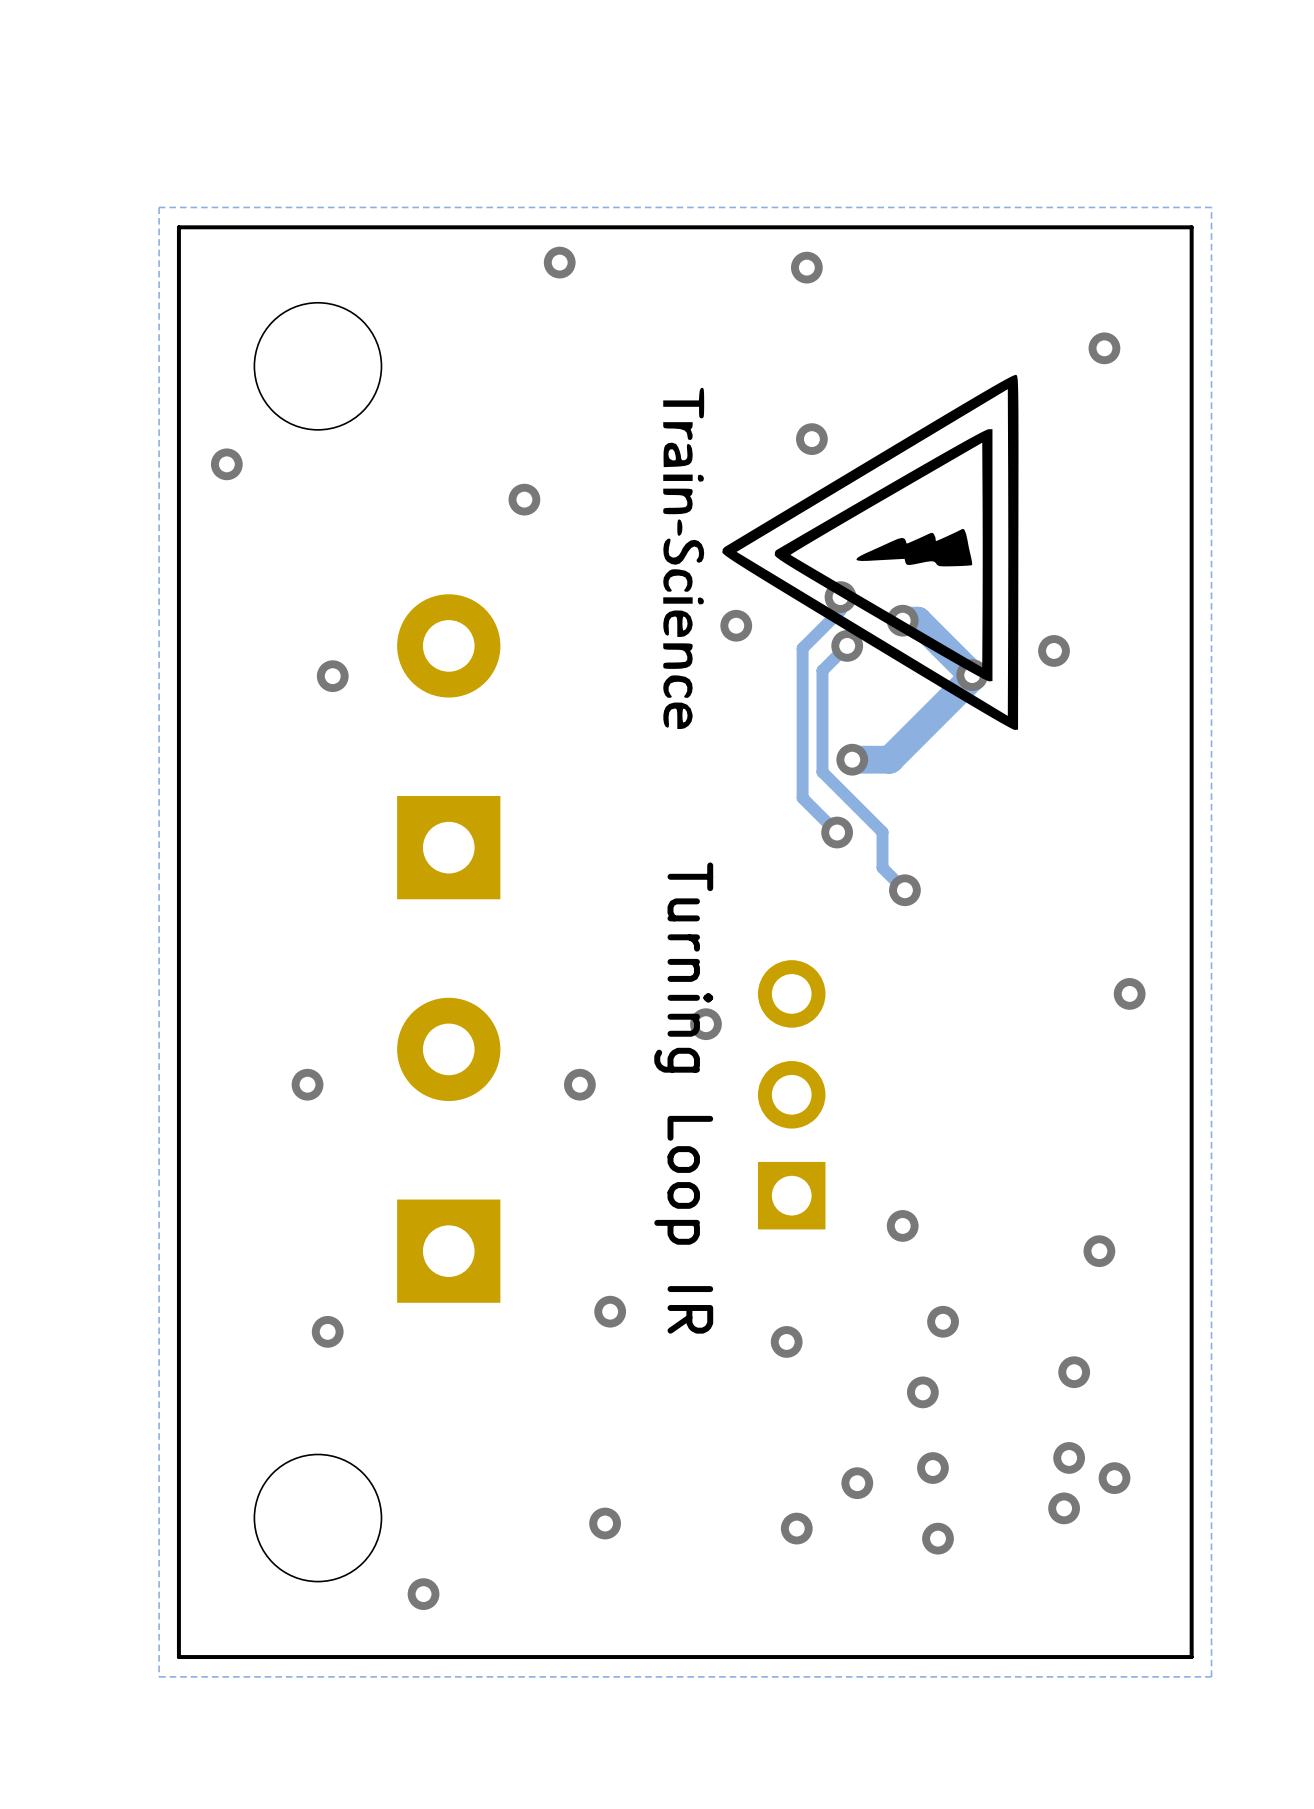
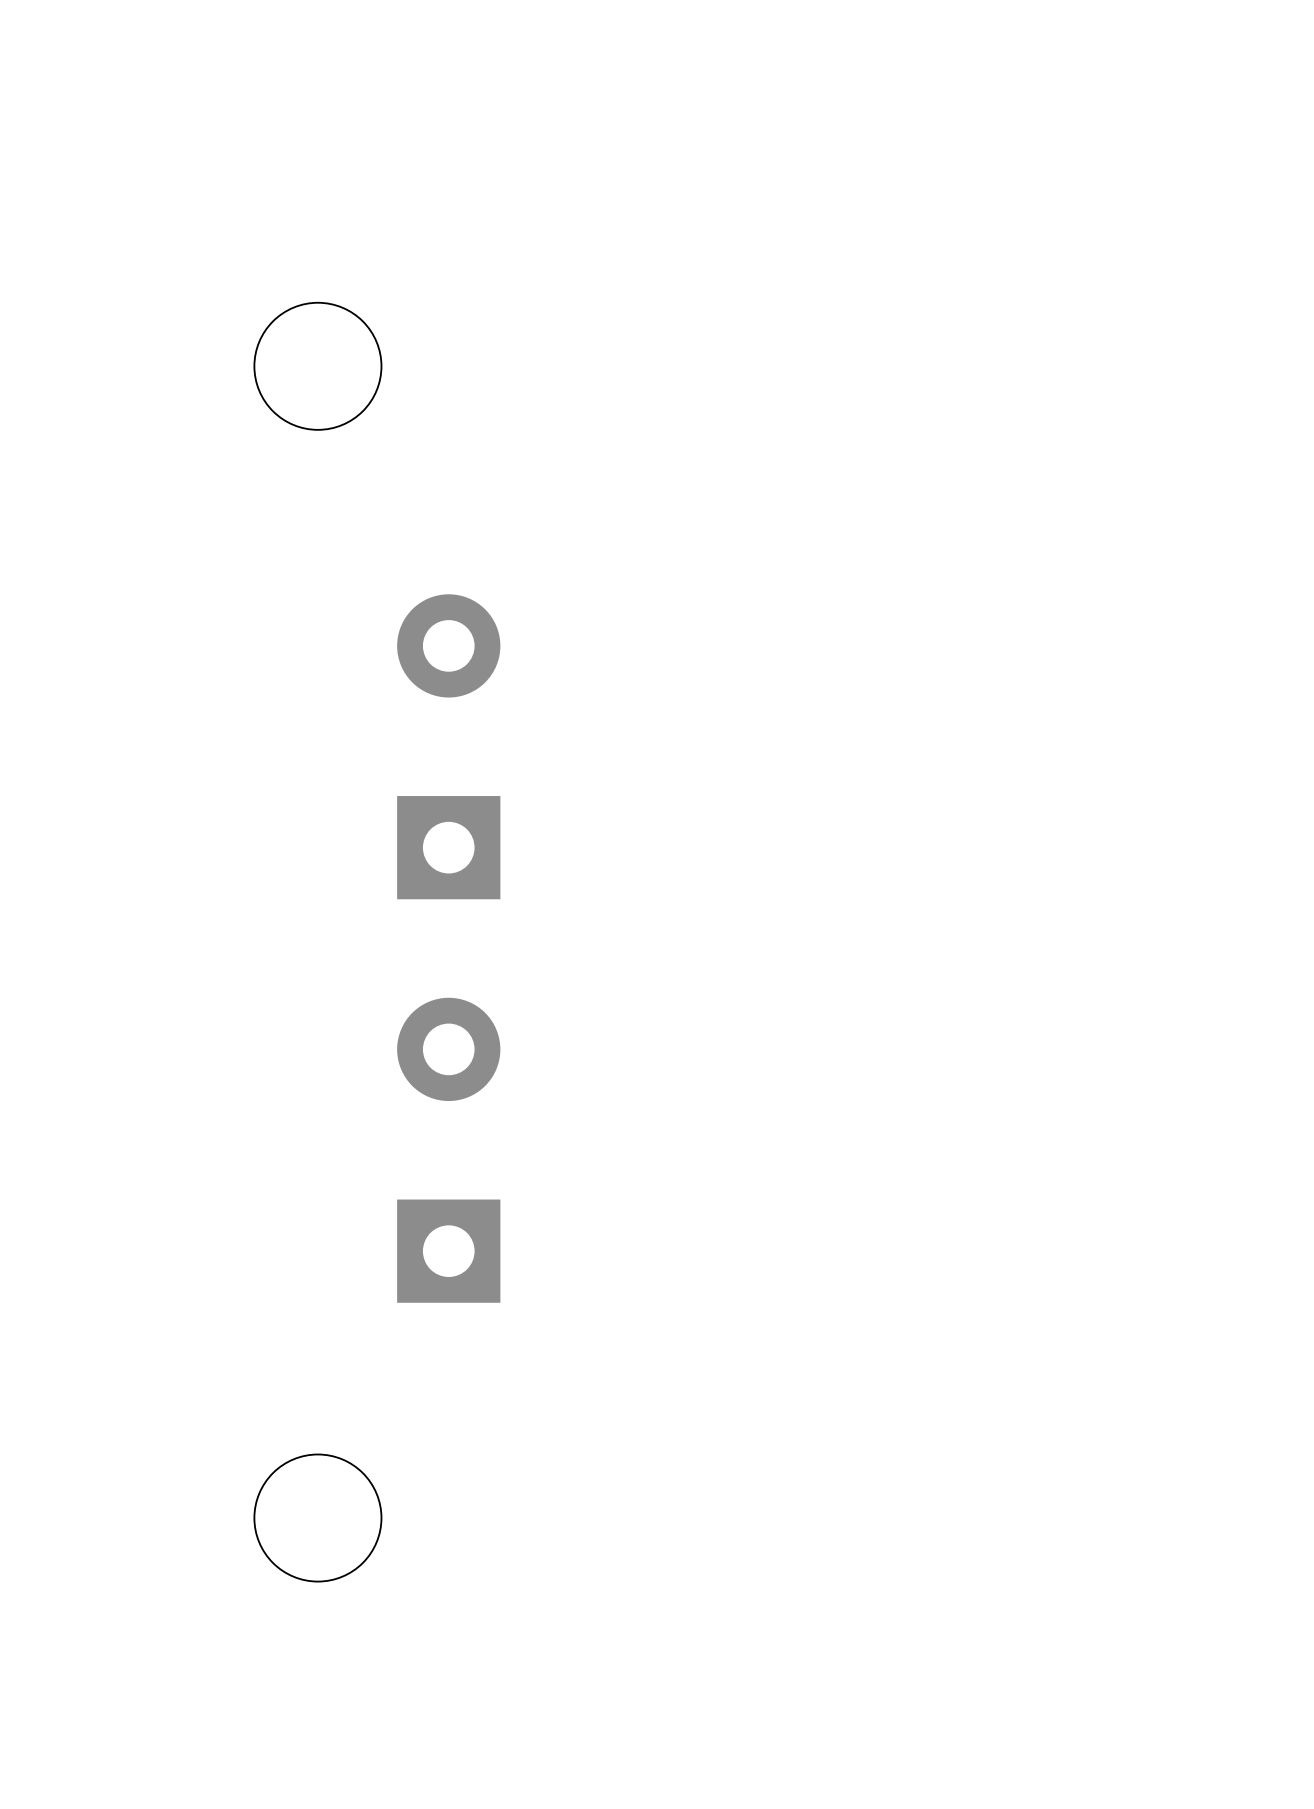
zone outline: (1211, 207) (159, 207) (159, 1676) (1211, 1676) (1211, 207) -> none
board edge: (1191, 227) (178, 227) (178, 1657) (1191, 1657) (1191, 227) -> none
via: (559, 262) -> none
via: (806, 267) -> none
via: (1104, 348) -> none
drawing: [663, 374, 1019, 730] -> none
via: (811, 439) -> none
via: (226, 464) -> none
via: (524, 499) -> none
track: (840, 597) (840, 610) (802, 648) (802, 798) (837, 832) -> none
via: (840, 597) -> none
track: (902, 620) (917, 620) (972, 677) (889, 759) (852, 759) -> none
via: (902, 620) -> none
via: (736, 625) -> none
track: (847, 645) (822, 670) (822, 772) (882, 832) (882, 867) (904, 890) -> none
via: (847, 645) -> none
via: (1054, 650) -> none
via: (972, 675) -> none
via: (332, 676) -> none
via: (852, 759) -> none
via: (837, 832) -> none
via: (904, 890) -> none
via: (1129, 993) -> none
via: (705, 1024) -> none
via: (307, 1084) -> none
via: (579, 1084) -> none
part: (791, 1094) -> none
text: Turning Loop IR (683, 1098) -> none
via: (902, 1225) -> none
via: (1099, 1251) -> none
via: (610, 1311) -> none
via: (943, 1321) -> none
via: (327, 1331) -> none
via: (786, 1341) -> none
via: (1074, 1372) -> none
via: (922, 1392) -> none
via: (1069, 1457) -> none
via: (932, 1468) -> none
via: (1114, 1478) -> none
via: (857, 1483) -> none
via: (1064, 1508) -> none
via: (605, 1523) -> none
via: (796, 1528) -> none
via: (938, 1538) -> none
via: (423, 1594) -> none

